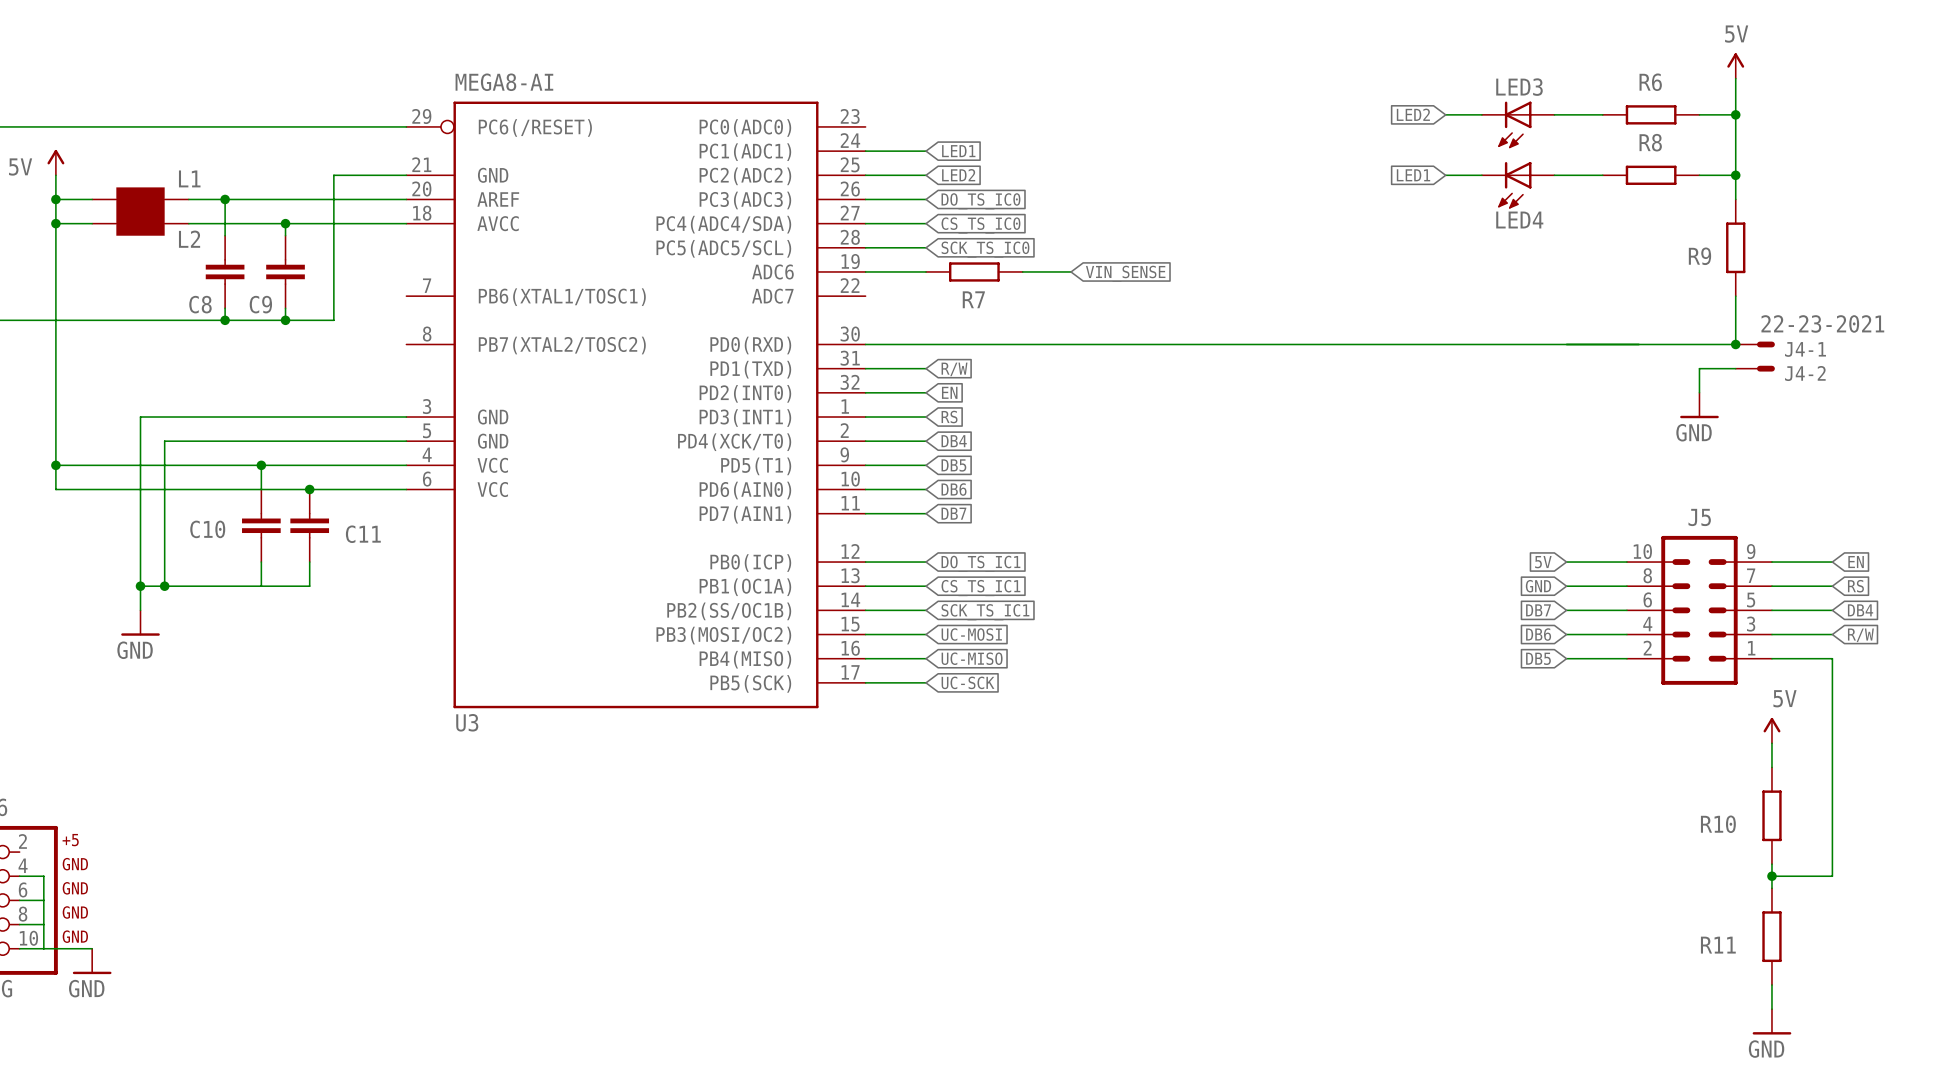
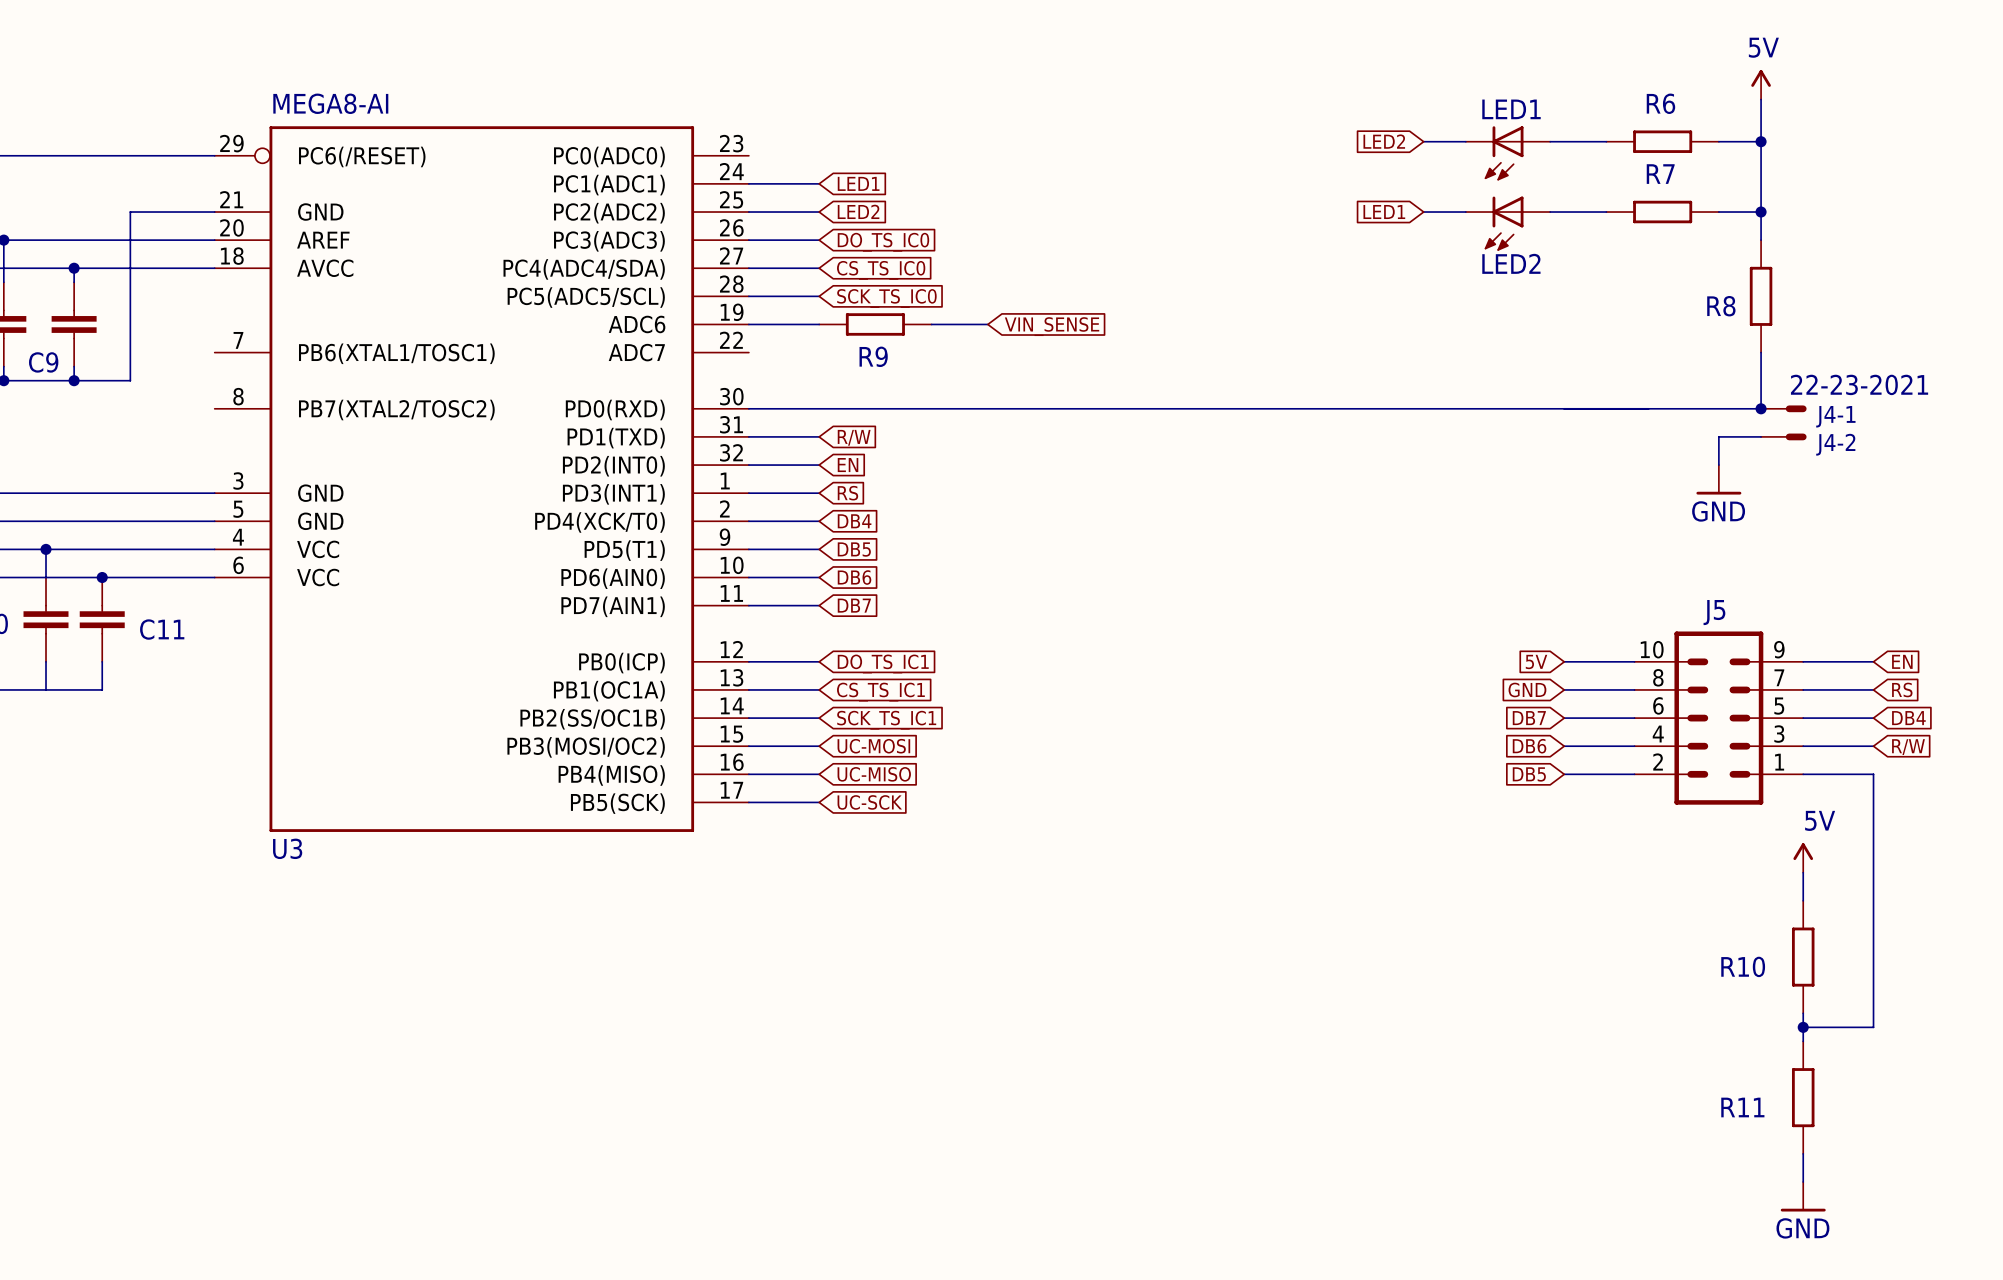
LED3 name: LED3 (1519, 87) -> LED1 (1511, 109)
R8 name: R8 (1650, 142) -> R7 (1660, 174)
LED4 name: LED4 (1519, 220) -> LED2 (1511, 263)
R9 name: R9 (1699, 256) -> R8 (1721, 306)
R7 name: R7 (973, 299) -> R9 (873, 356)

